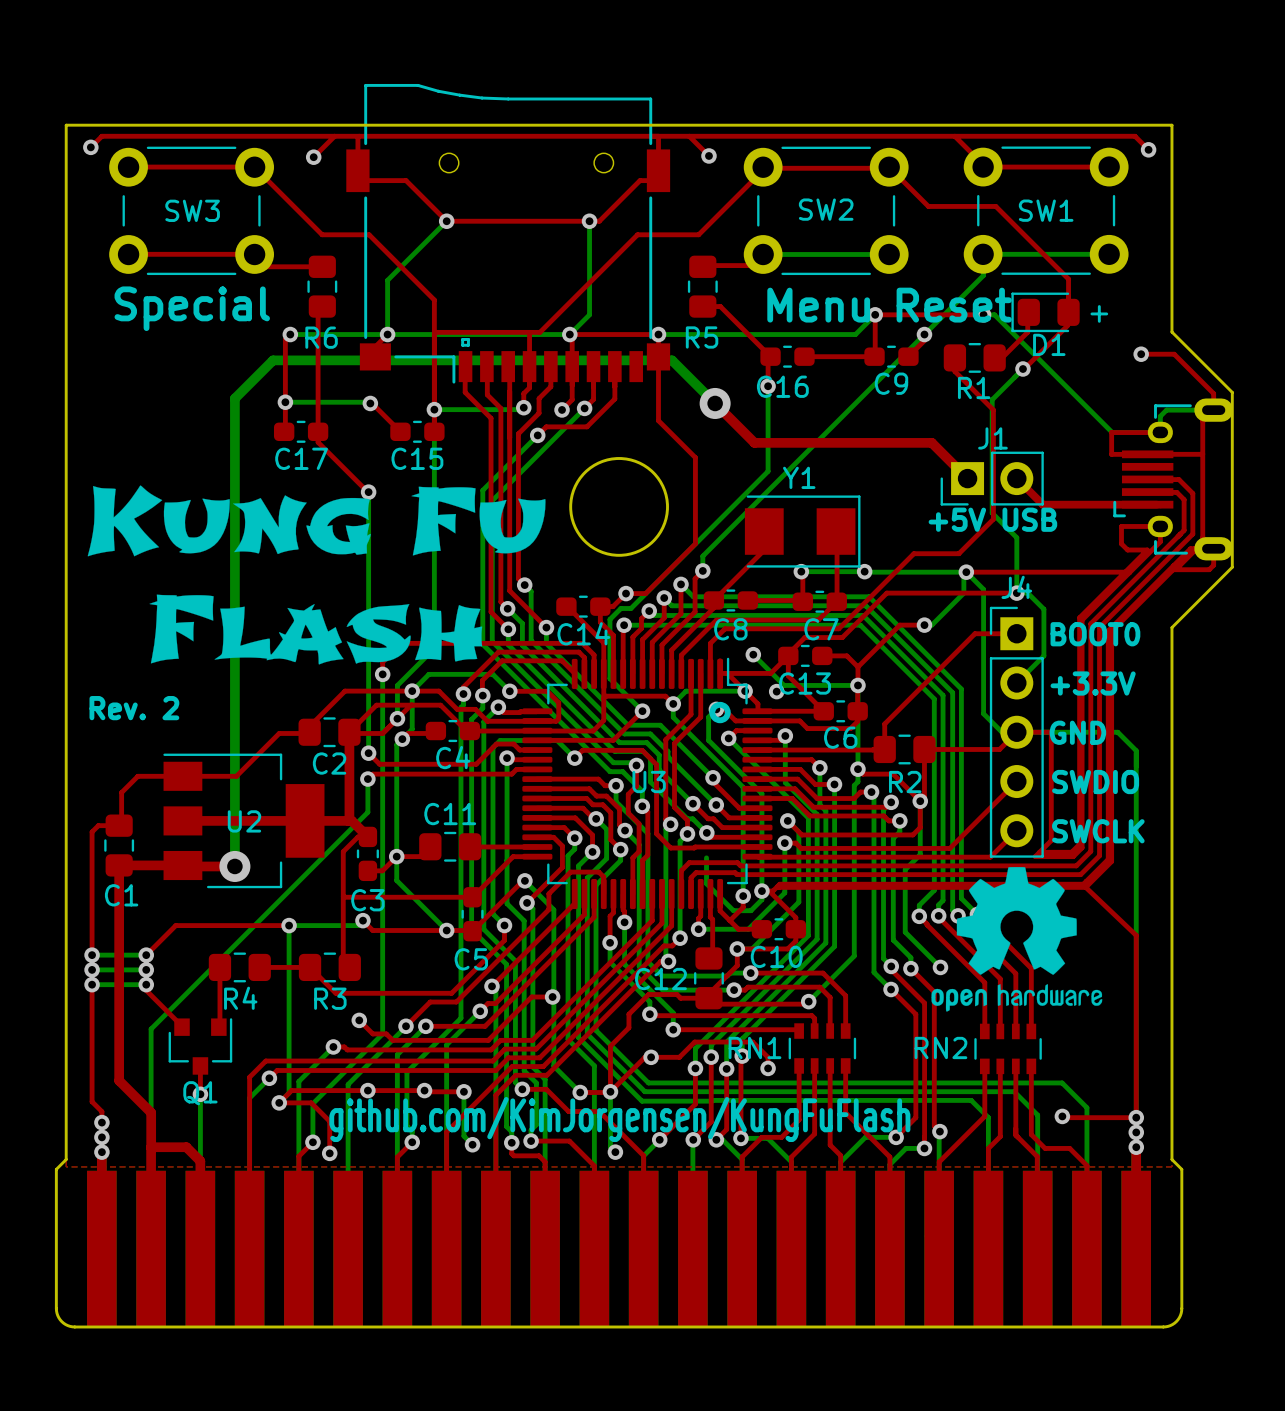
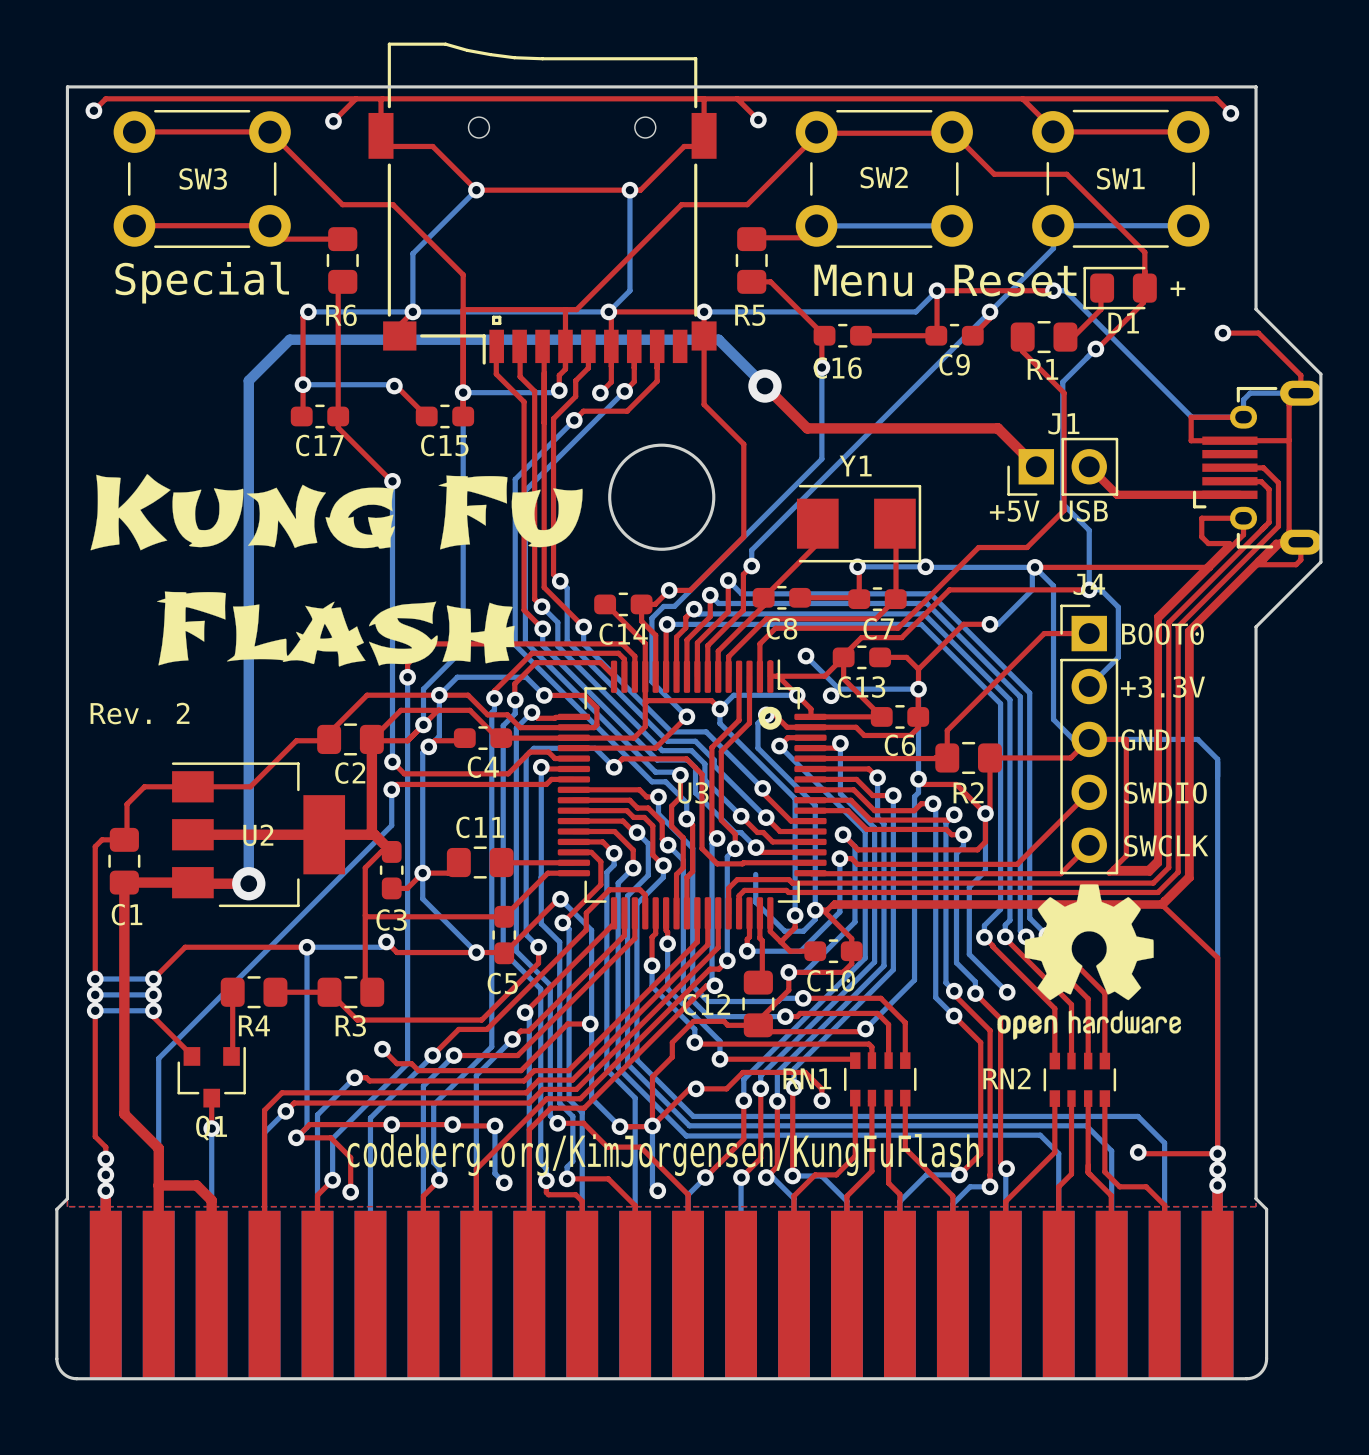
text: github.com/KimJorgensen/KungFuFlash (619, 1119) -> codeberg.org/KimJorgensen/KungFuFlash (663, 1155)

